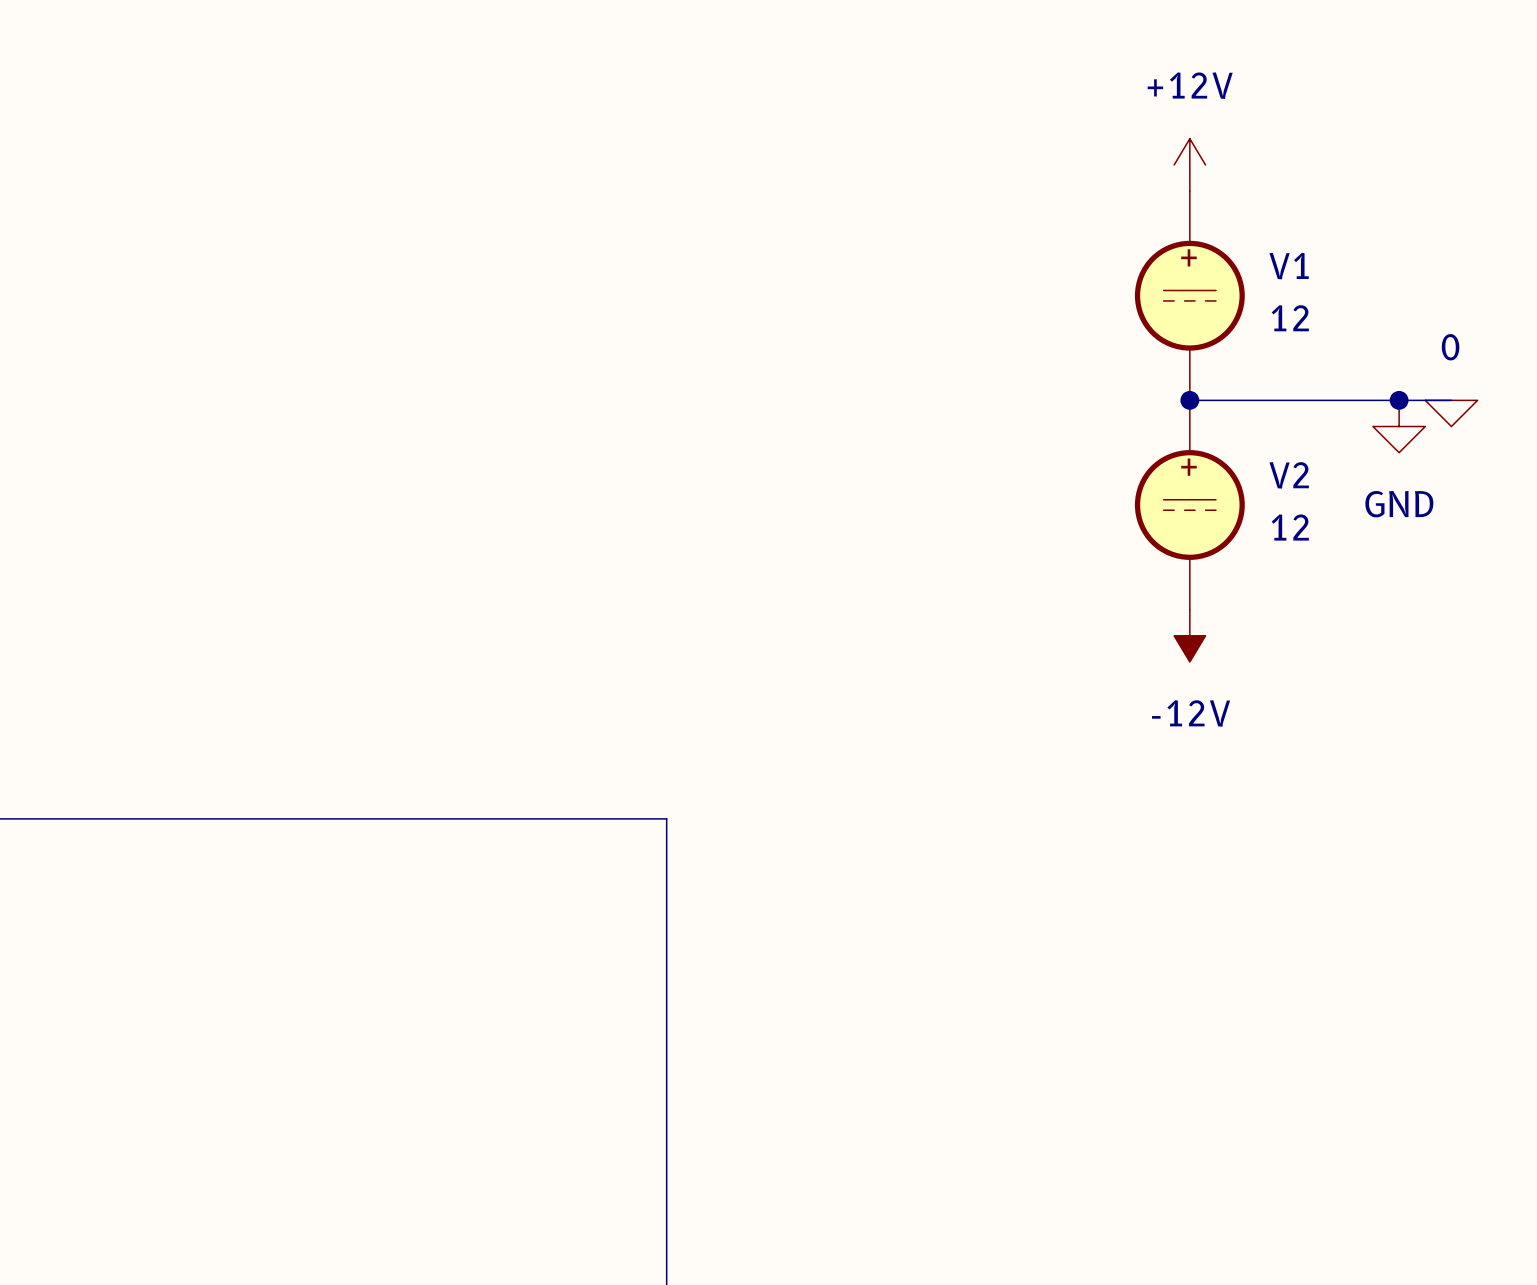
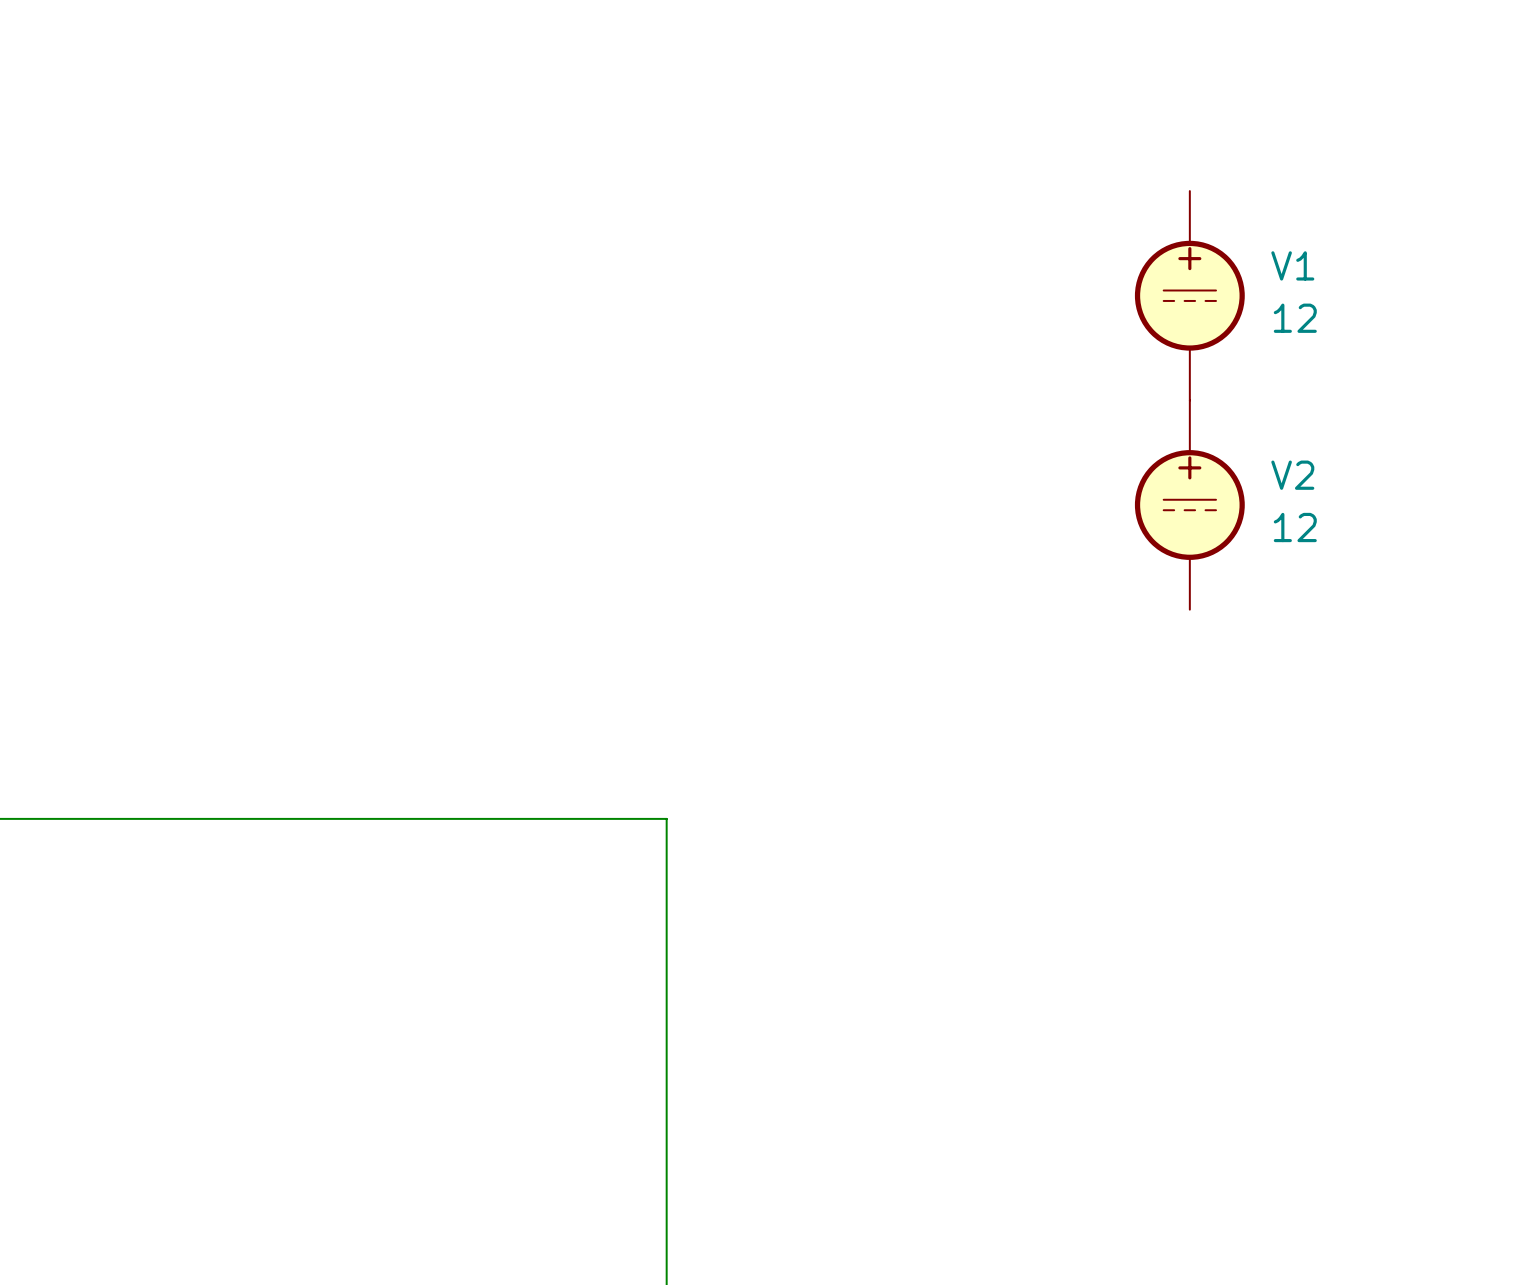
power symbol: +12V (1189, 164) -> none
wire: (1189, 400) (1451, 400) -> none
junction: (1189, 400) -> none
junction: (1399, 400) -> none
power symbol: 0 (1451, 413) -> none
power symbol: GND (1399, 426) -> none
power symbol: -12V (1189, 635) -> none

